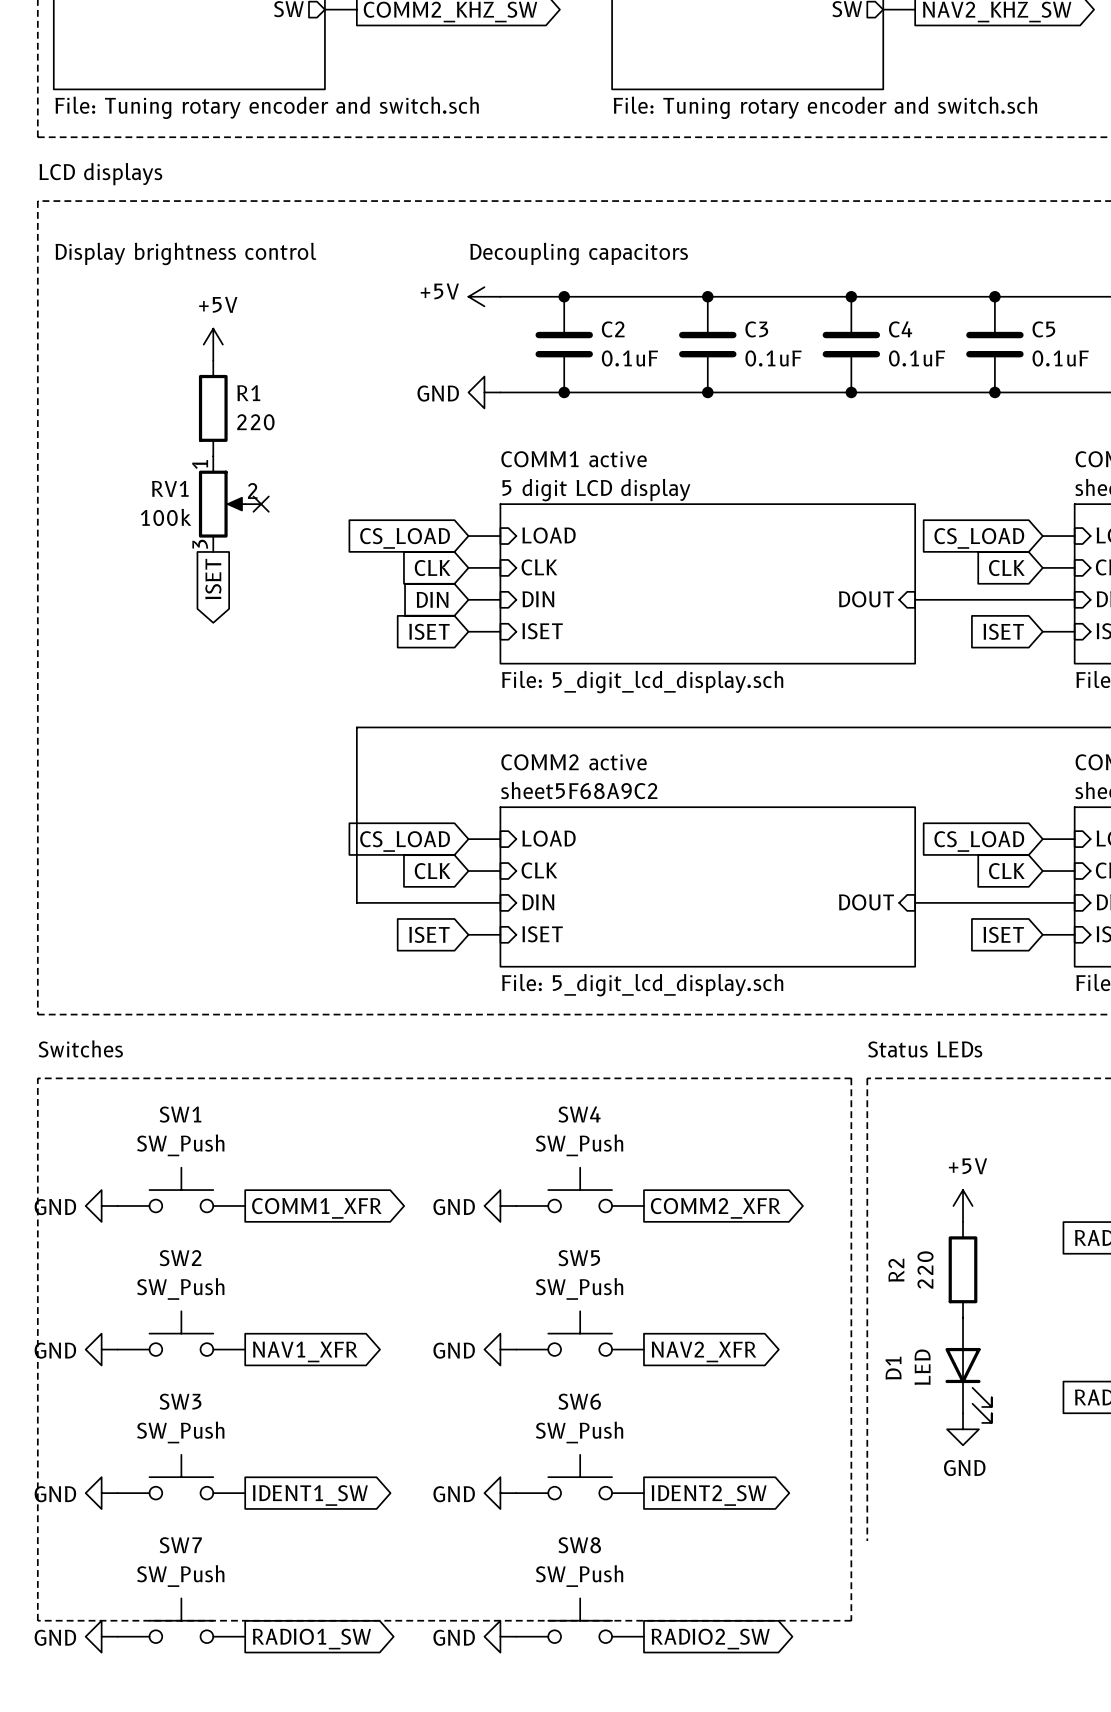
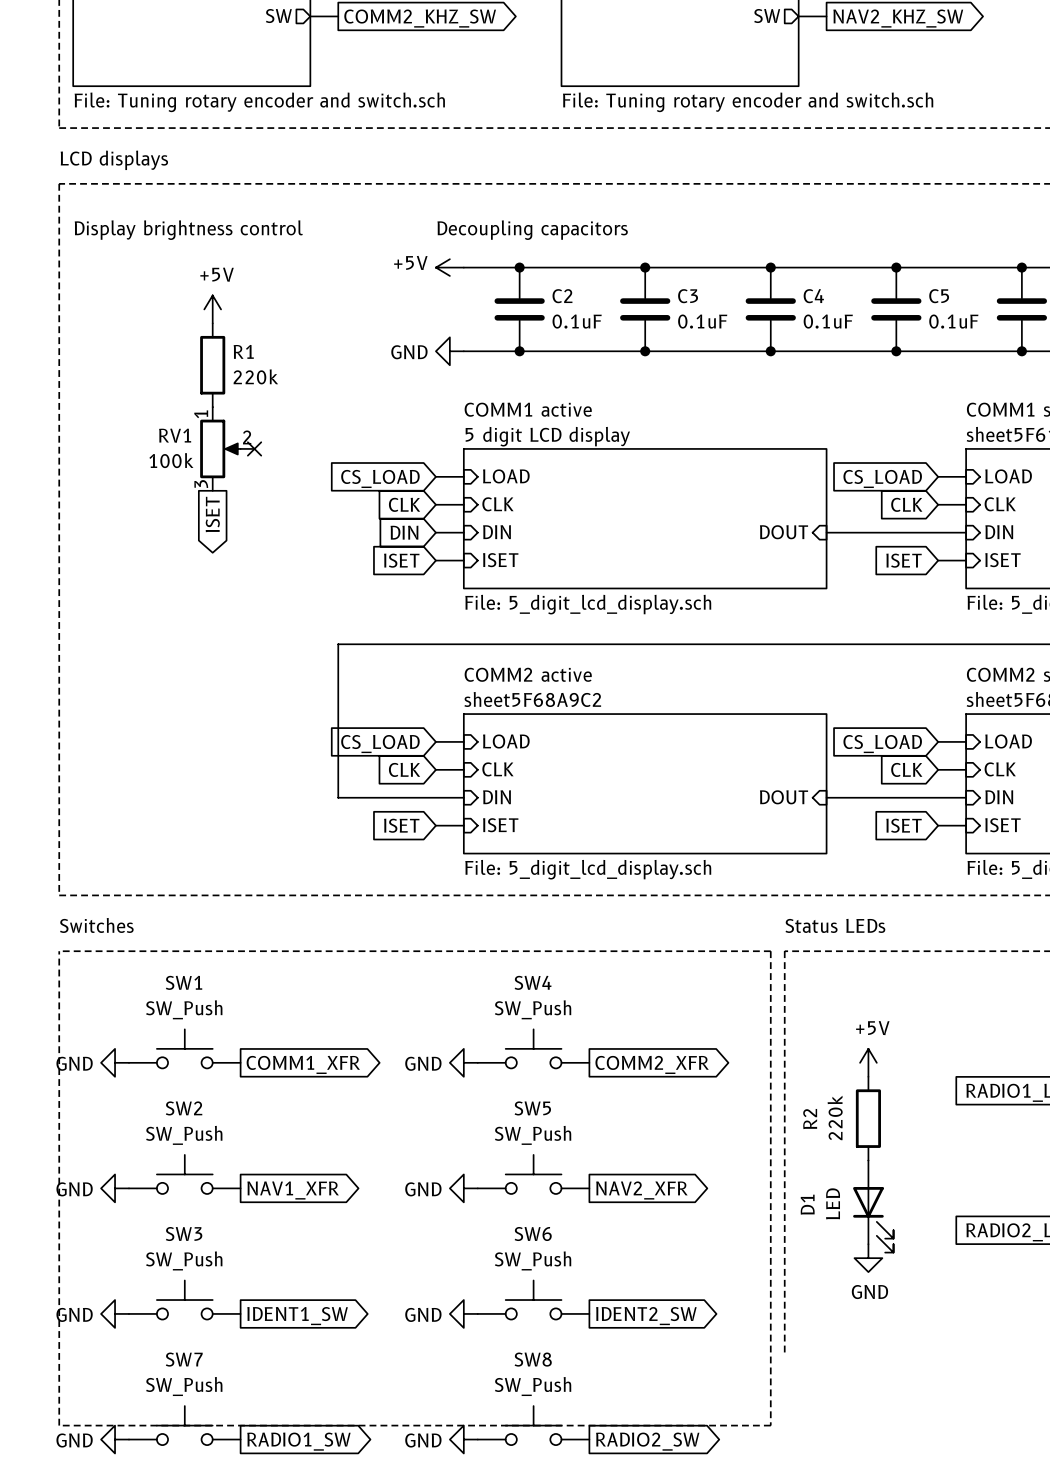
R1 value: 220 (255, 422) -> 220k (255, 376)
R2 value: 220 (925, 1270) -> 220k (835, 1117)

